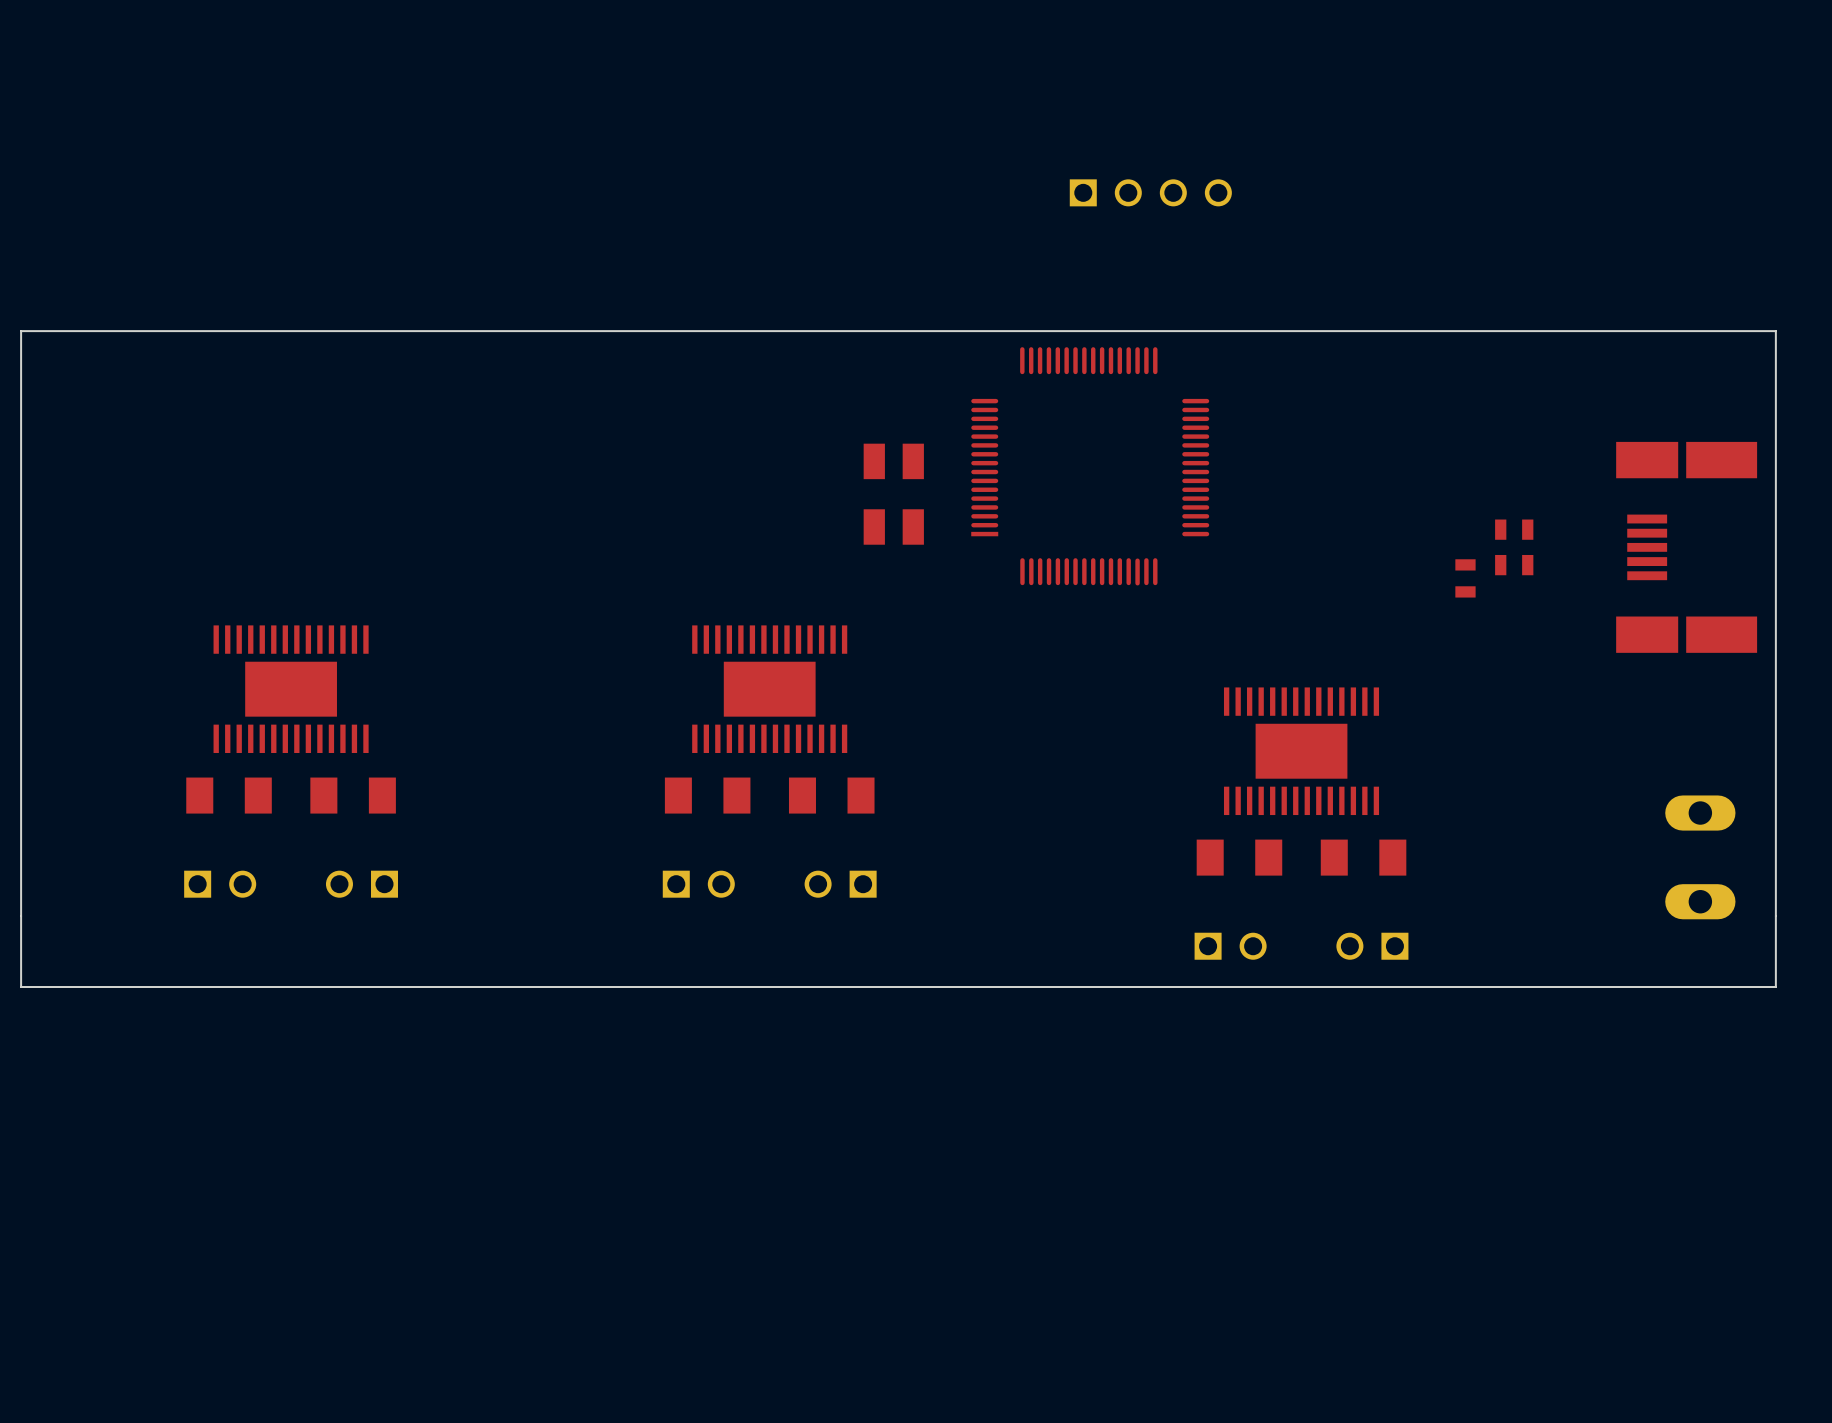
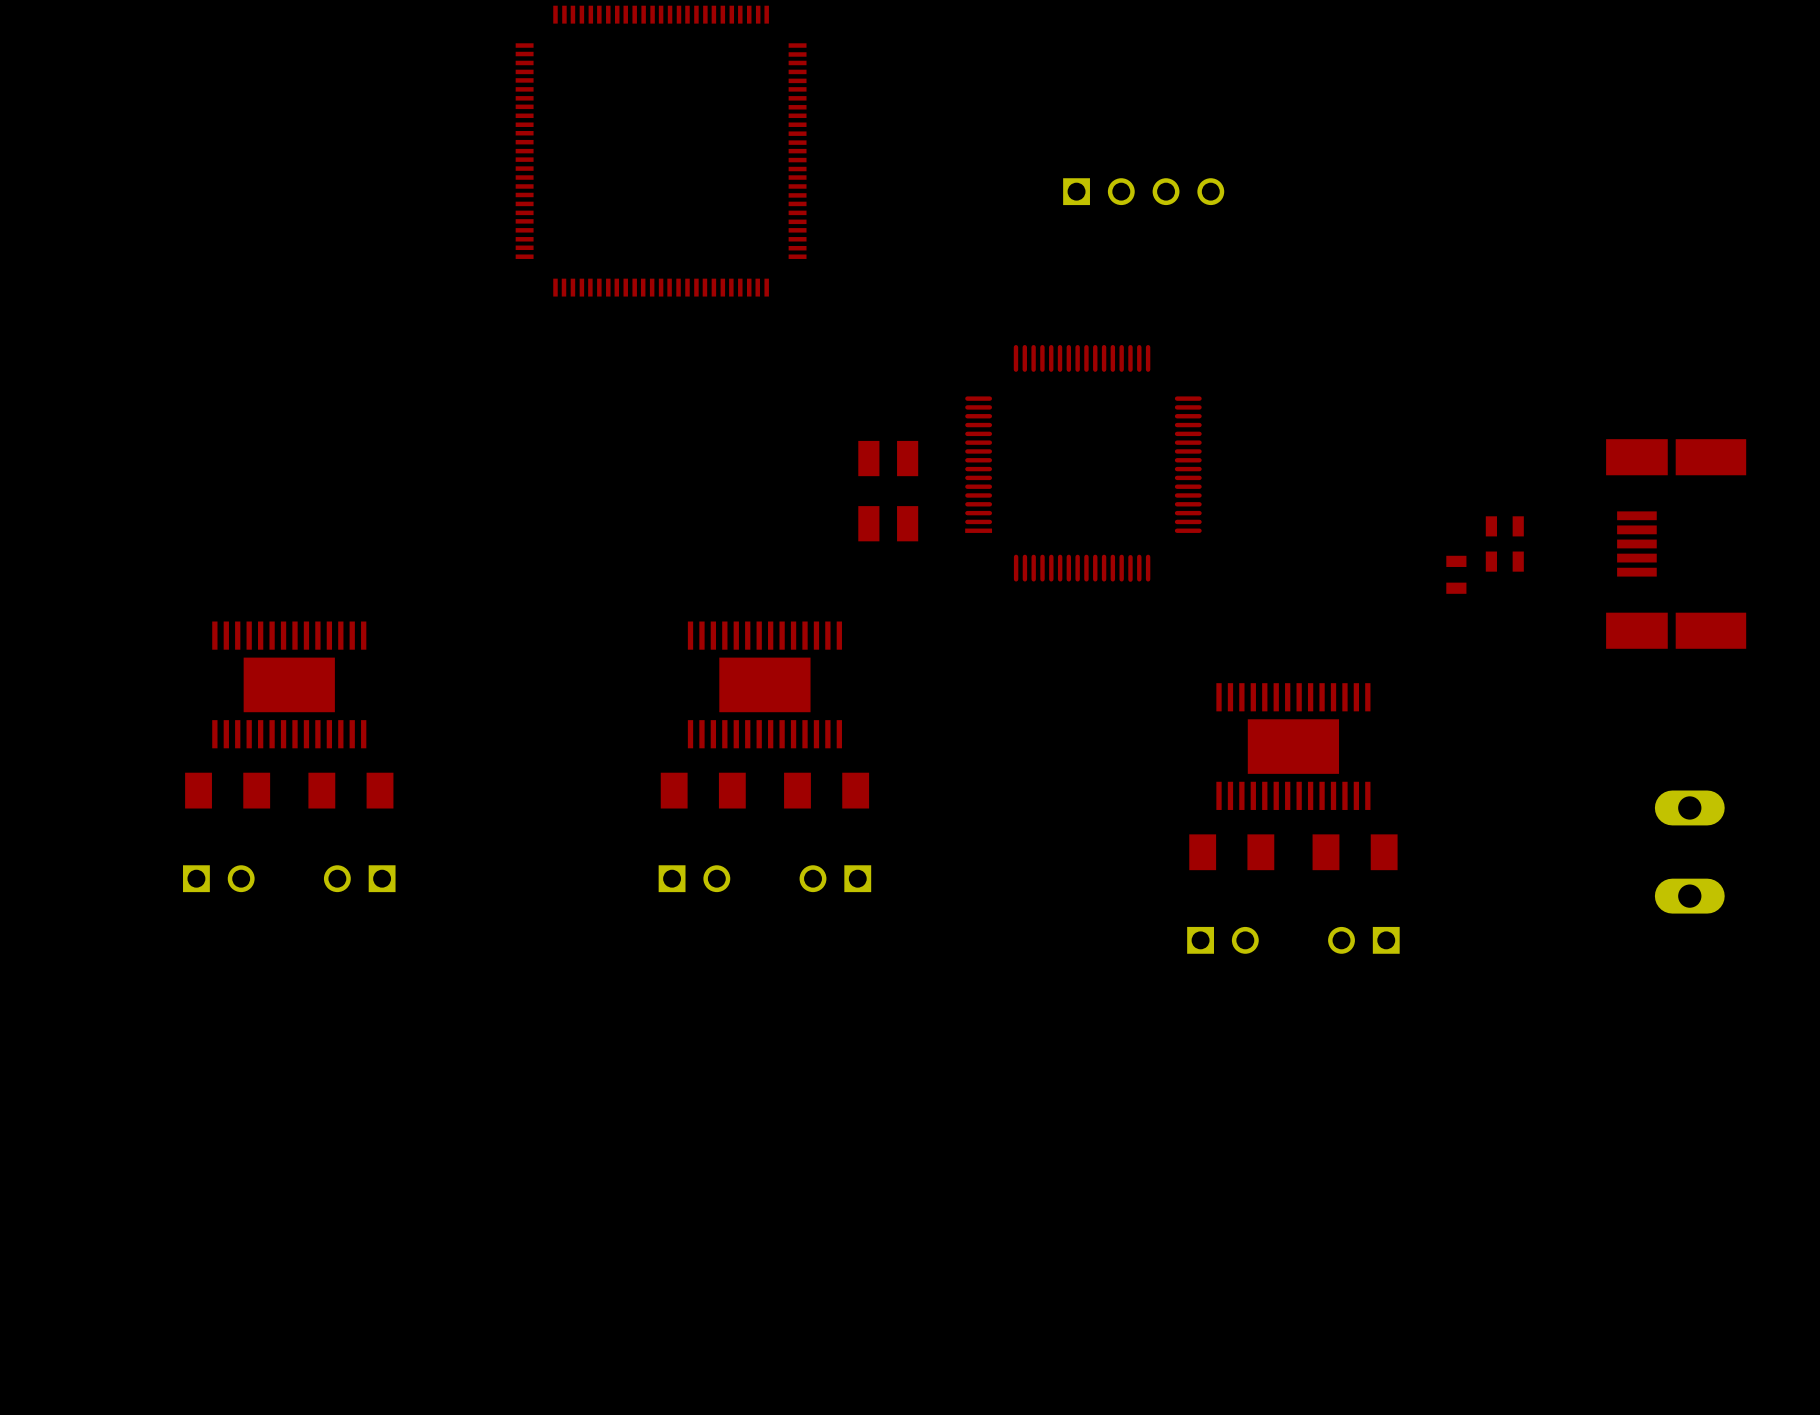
part: none -> (661, 151)
board edge: (1775, 331) (1775, 987) (21, 987) (21, 331) (1775, 331) -> none

